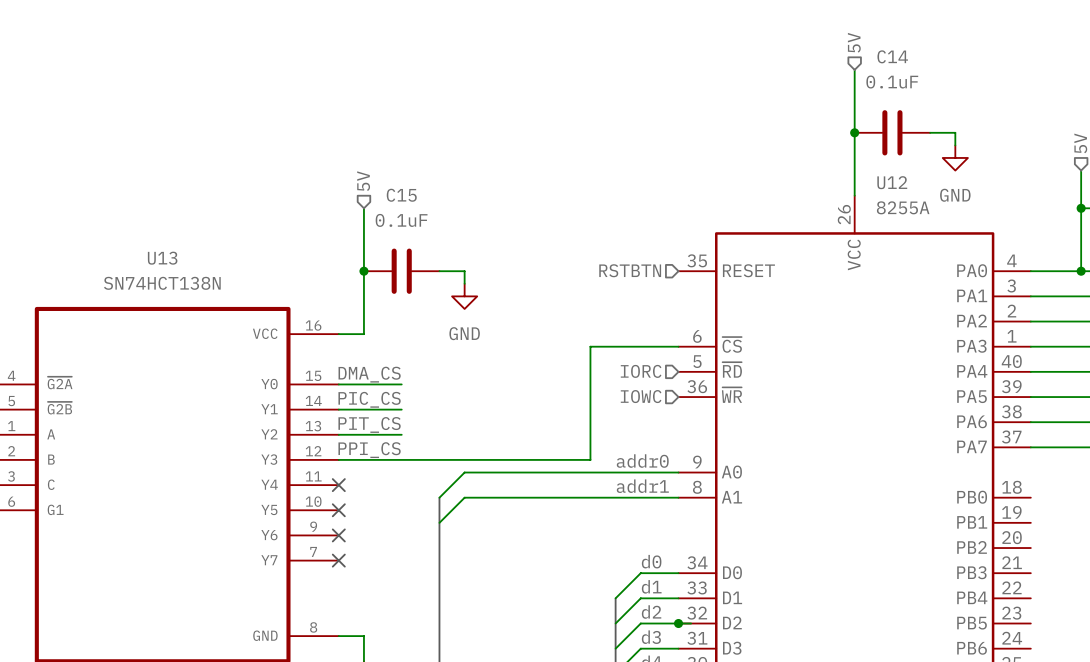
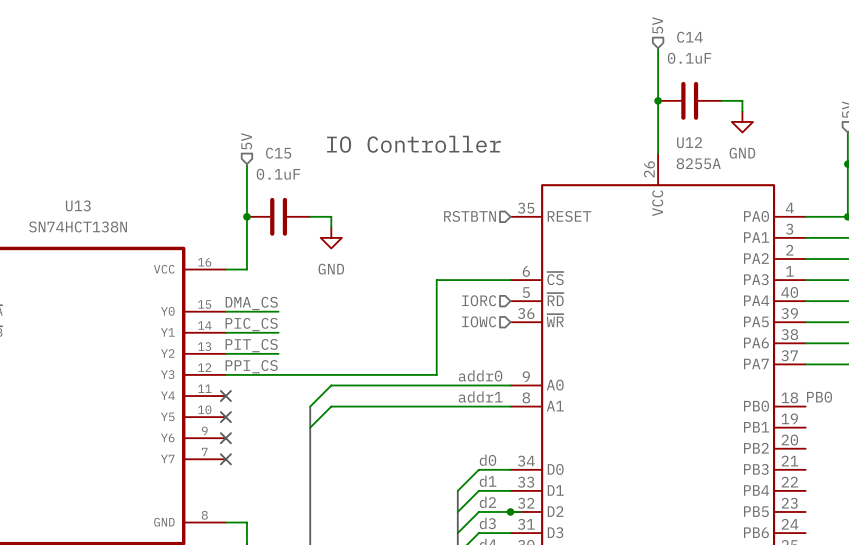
text: none -> IO Controller (414, 144)
label: none -> PB0 (819, 397)

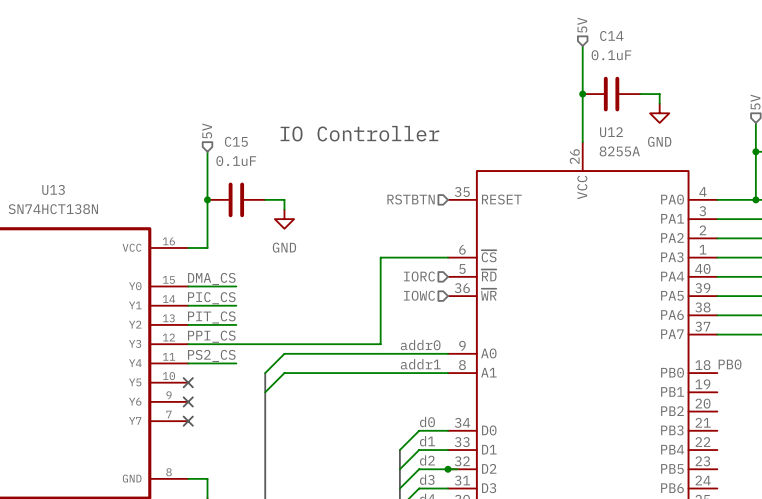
label: none -> PS2_CS (211, 355)
wire: none -> (188, 363) (236, 363)
no-connect mark: (225, 396) -> none

